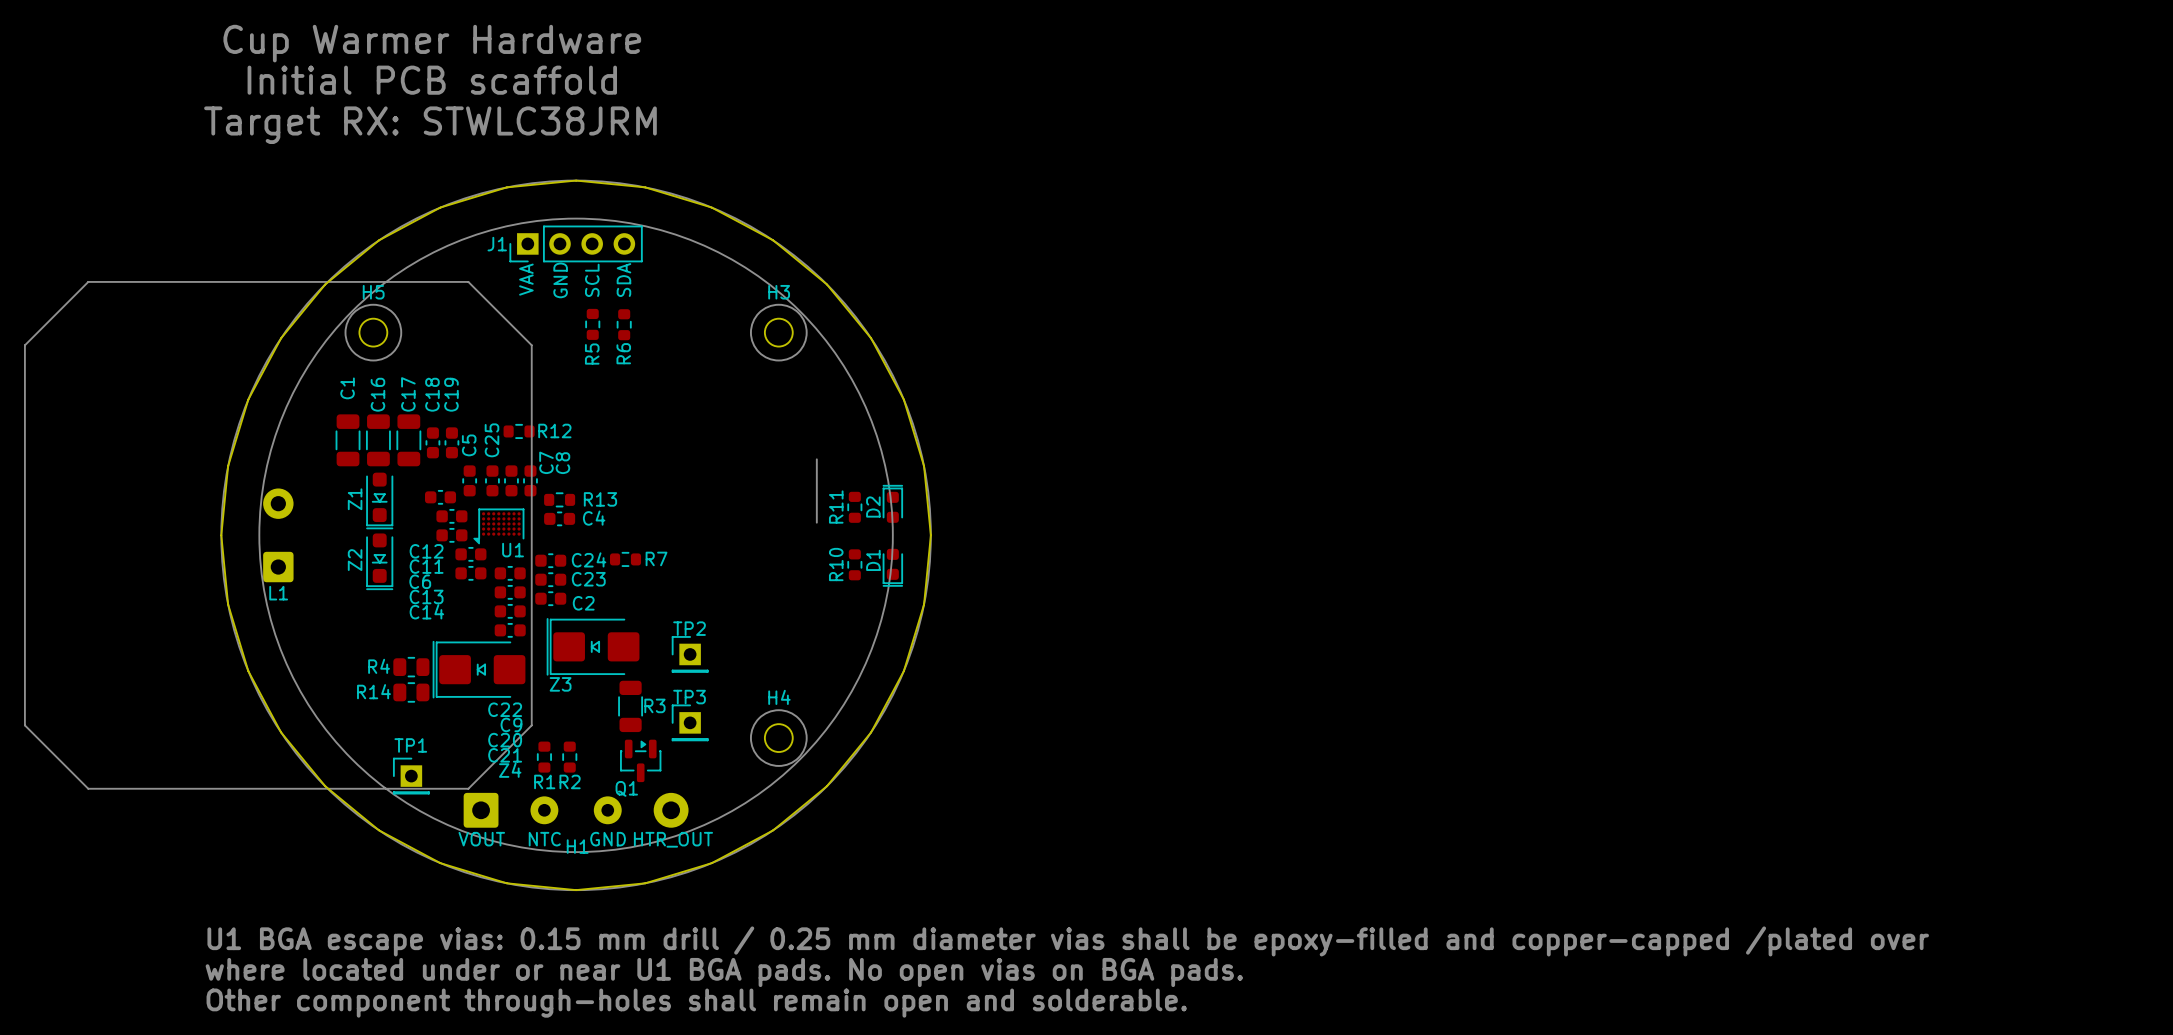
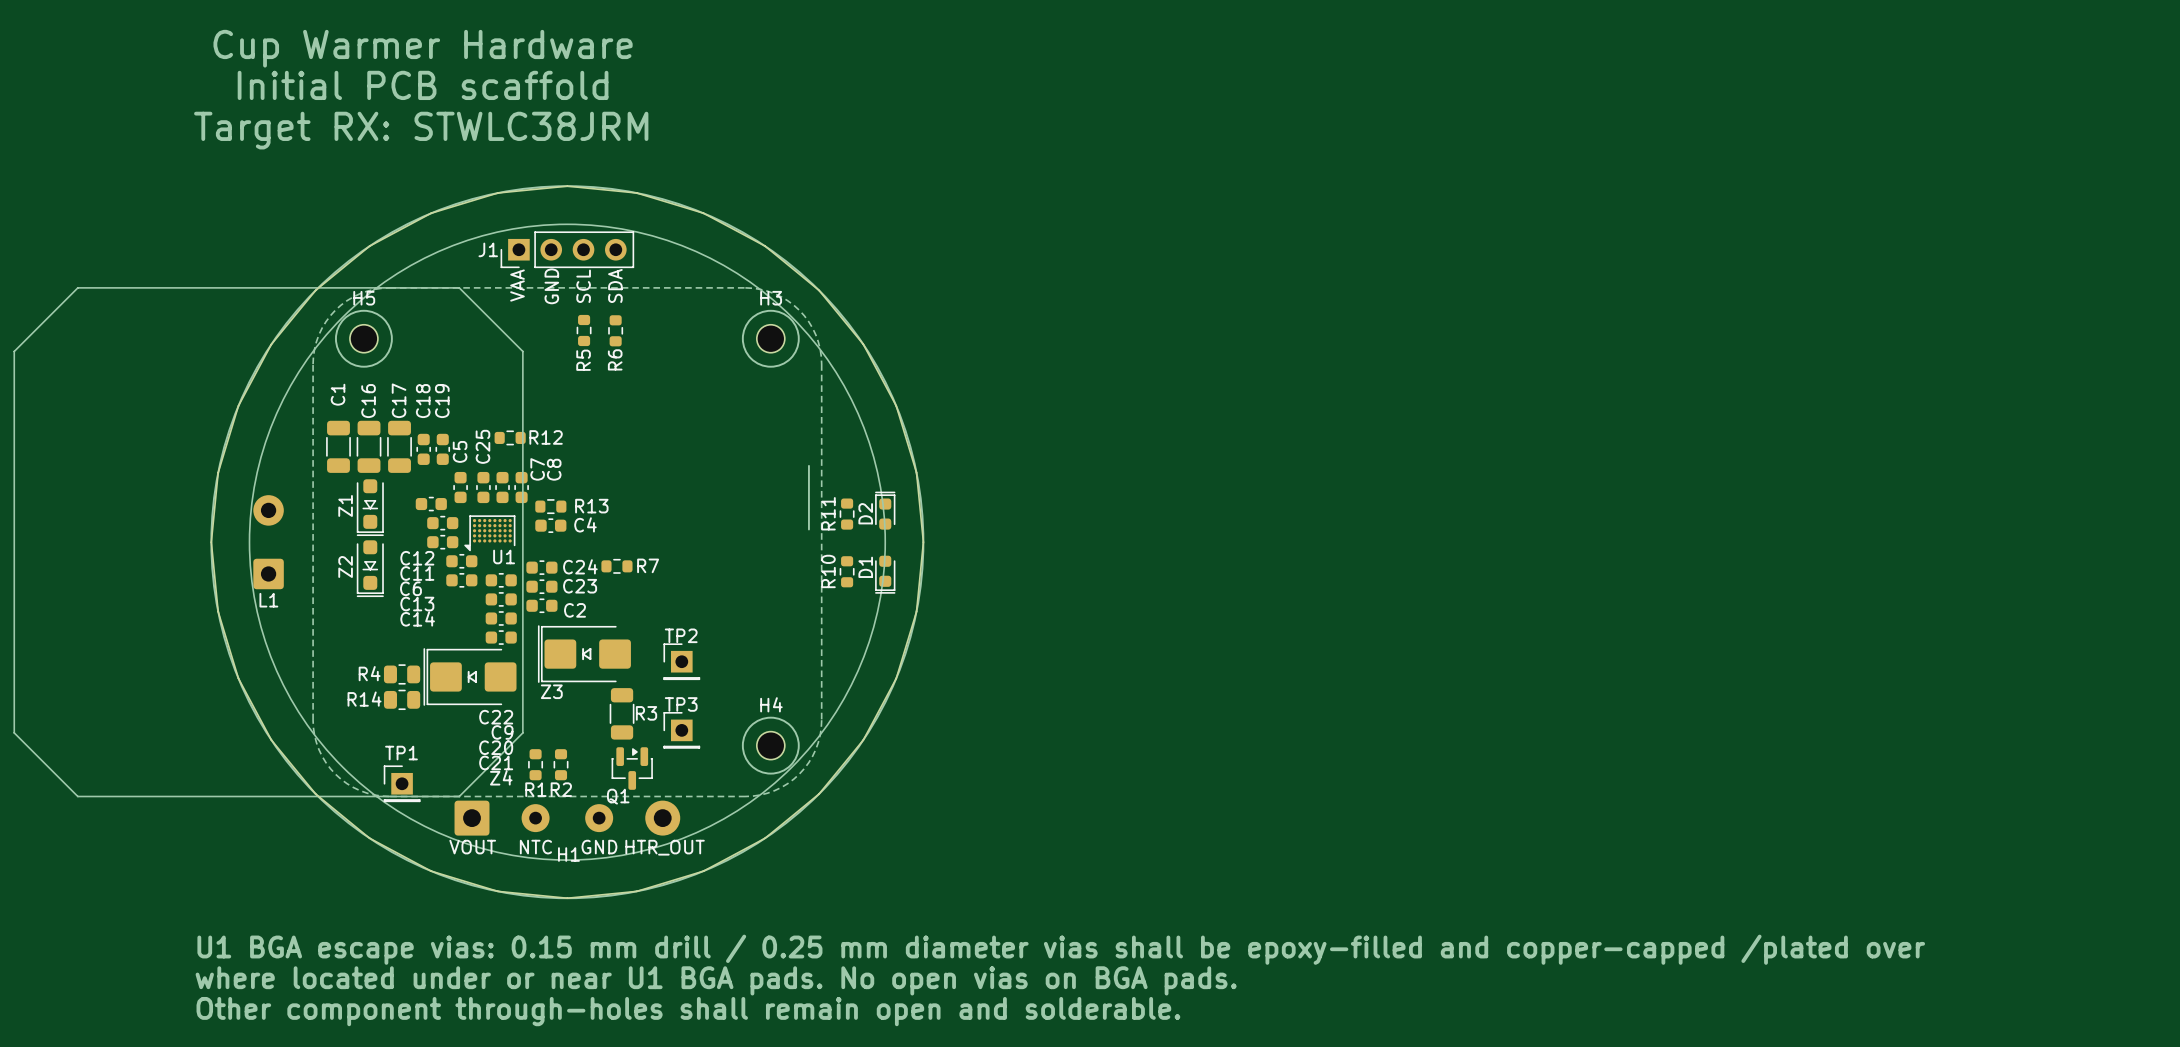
line: none -> (389, 287) (752, 288) (781, 296) (804, 315) (815, 334) (821, 364) (821, 720) (818, 742) (812, 756) (793, 779) (767, 793) (745, 796) (389, 796) (374, 795) (353, 787) (330, 768) (316, 742) (313, 720) (313, 356) (322, 328) (340, 305) (367, 291) (389, 287)

